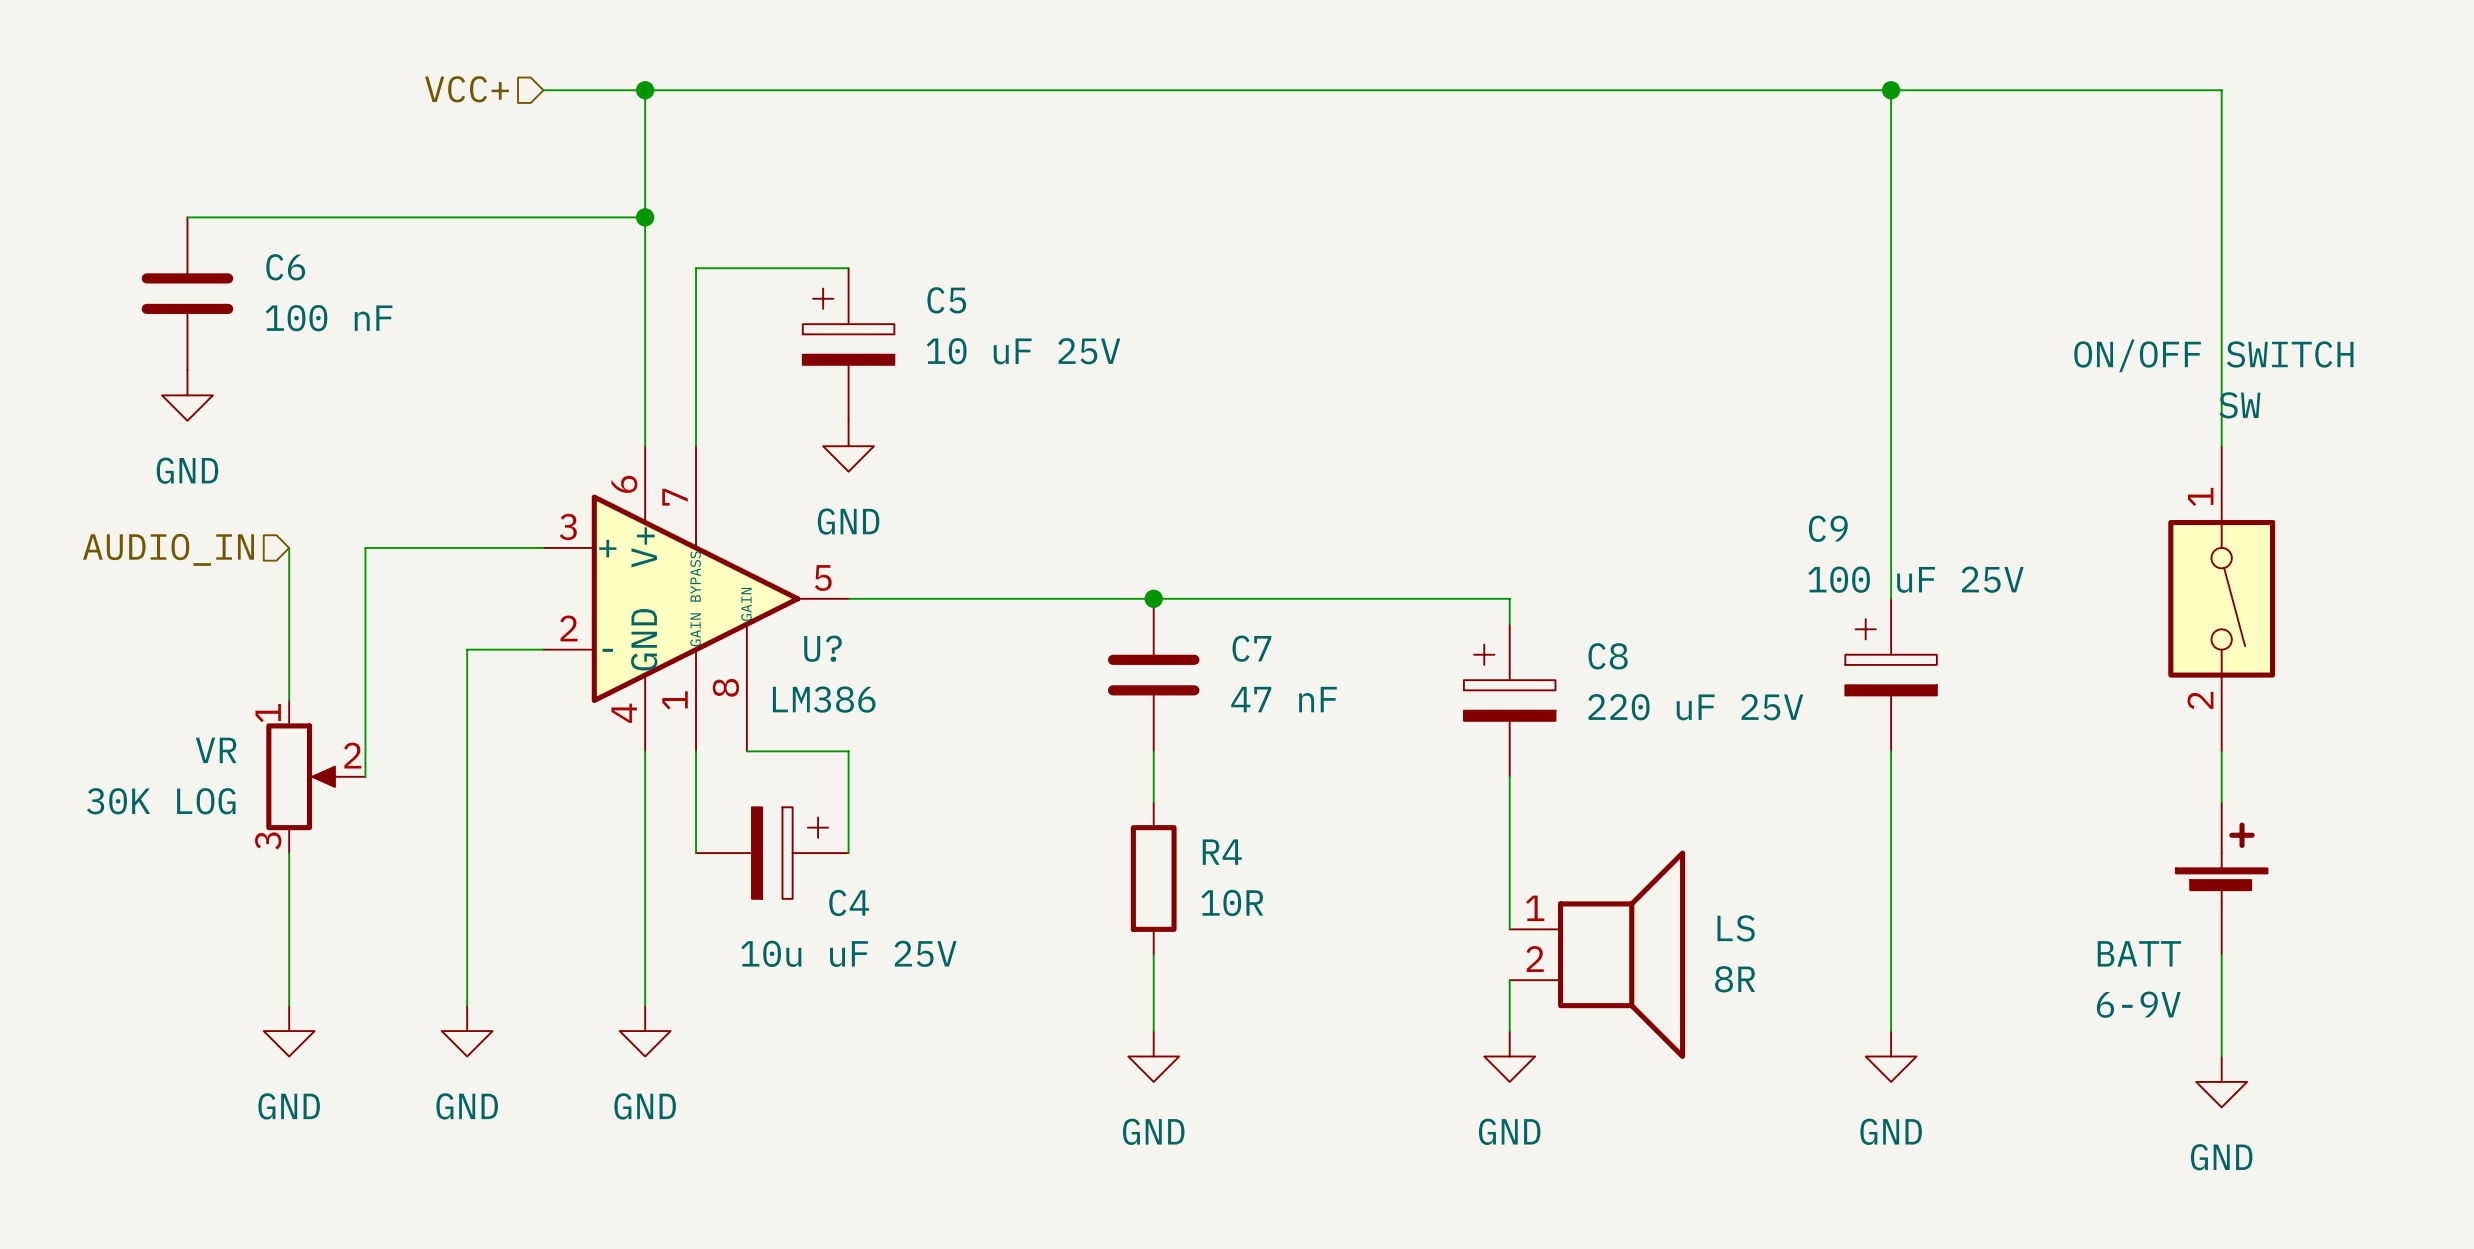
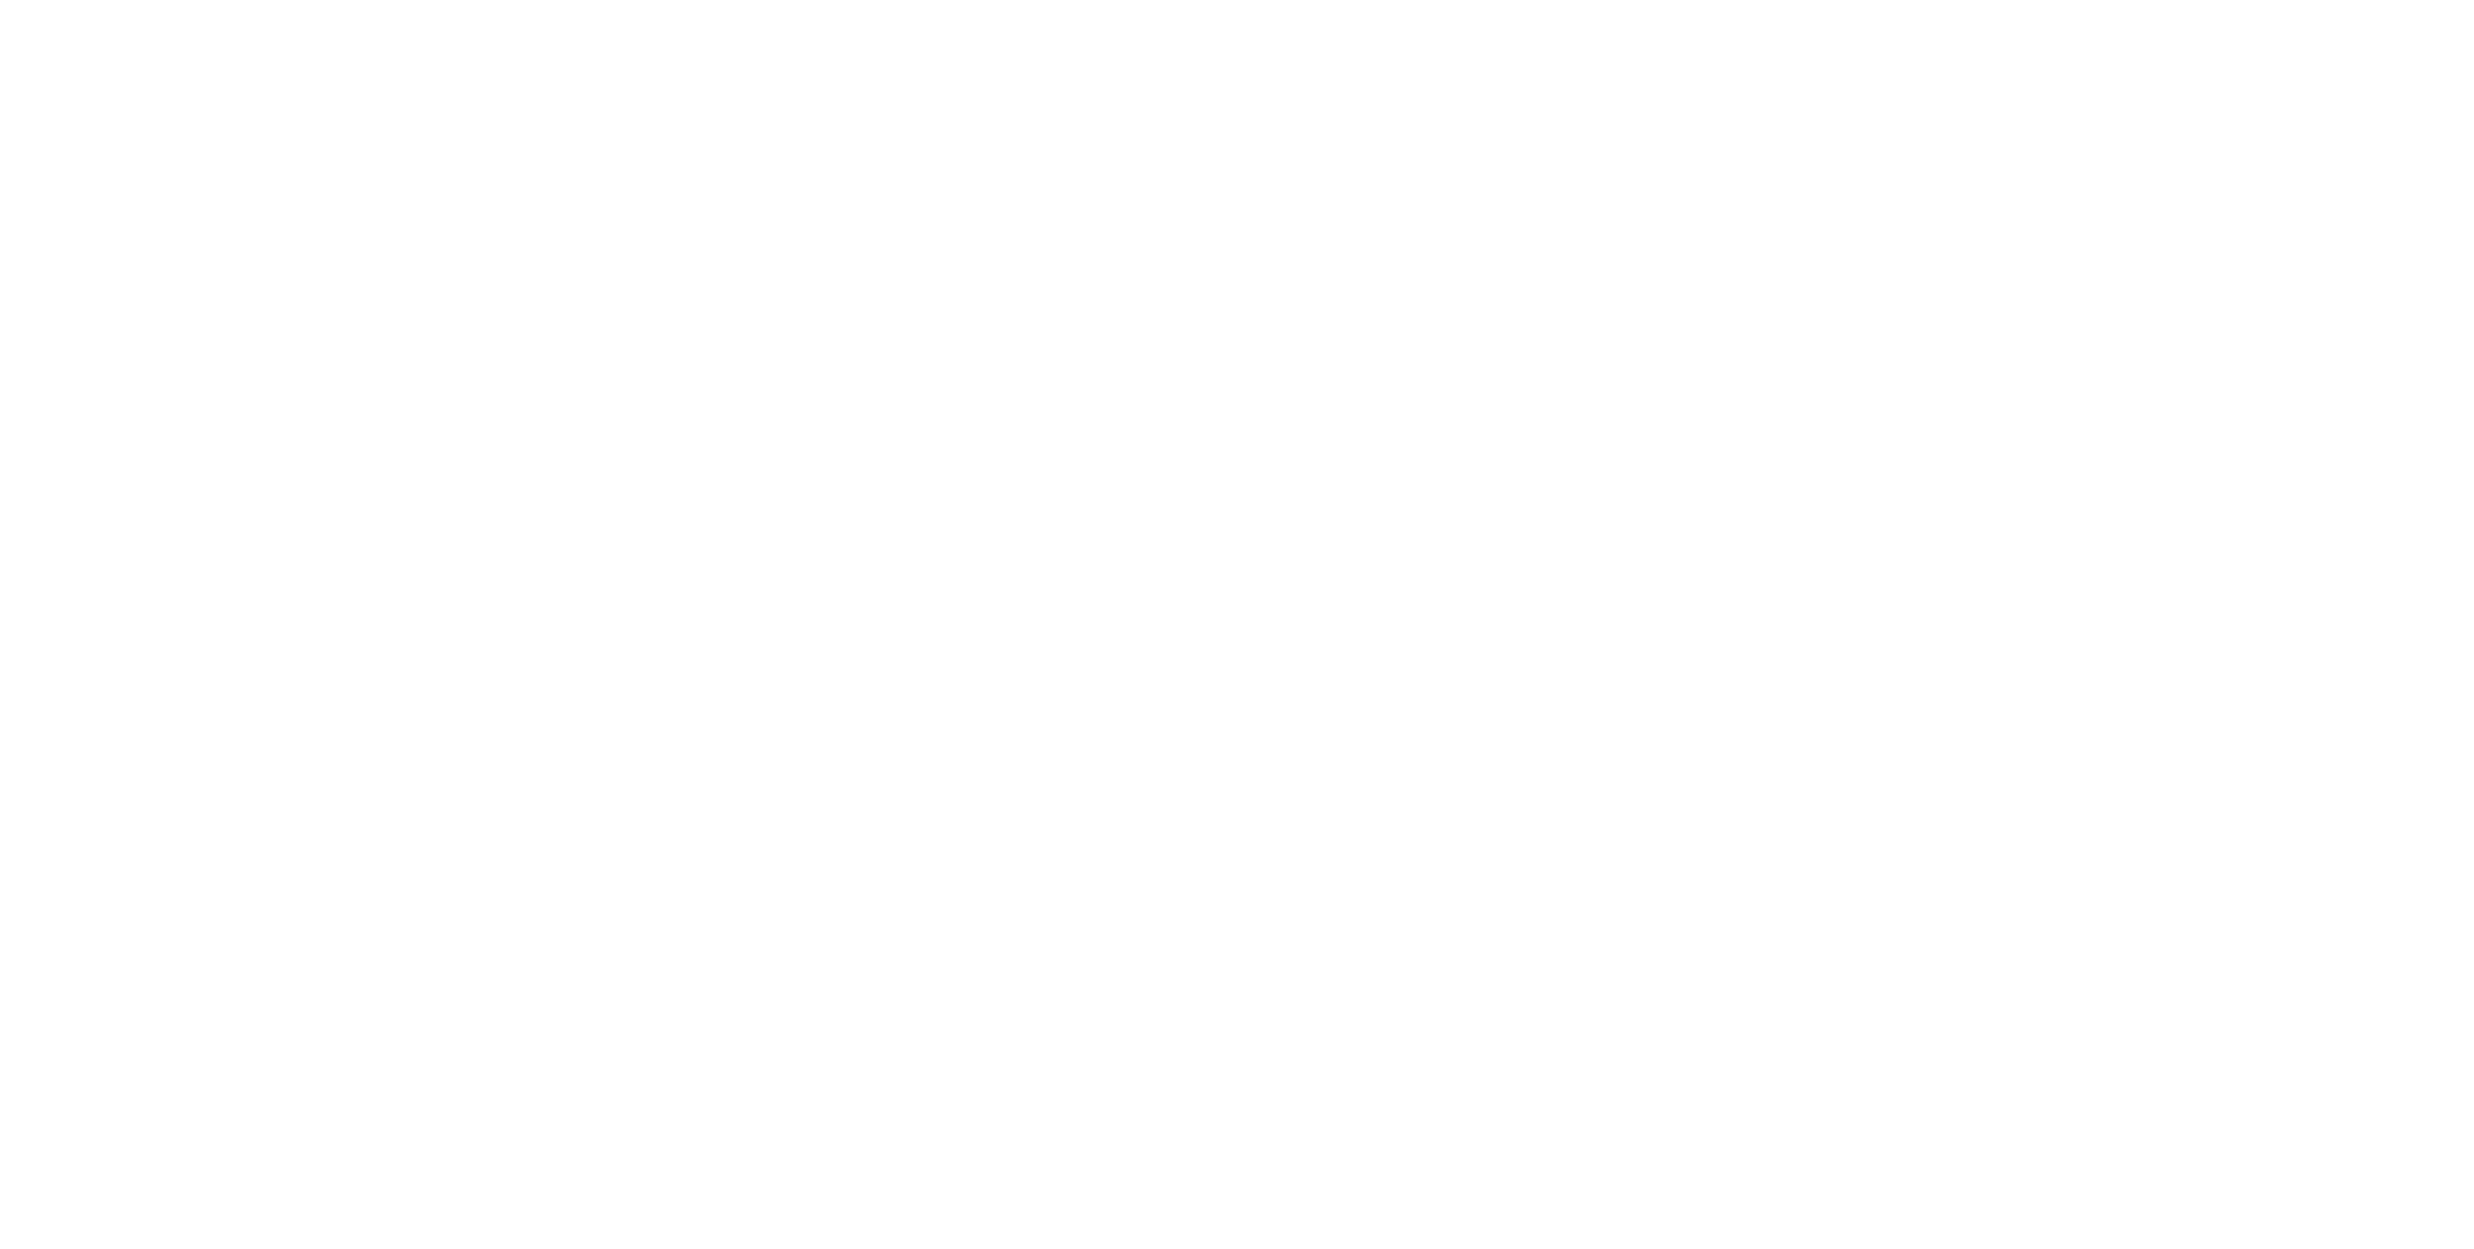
hierarchical label: VCC+ (466, 89) -> none
wire: (543, 90) (2221, 90) (2221, 446) -> none
wire: (645, 90) (645, 446) -> none
junction: (645, 90) -> none
wire: (1891, 90) (1891, 598) -> none
junction: (1891, 90) -> none
wire: (187, 217) (645, 217) -> none
junction: (645, 217) -> none
wire: (848, 268) (696, 268) (696, 446) -> none
C6: 100 nF (187, 293) -> none
C5: 10 uF 25V (848, 344) -> none
power symbol: GND (187, 395) -> none
power symbol: GND (848, 446) -> none
wire: (289, 547) (289, 700) -> none
wire: (543, 547) (365, 547) (365, 776) -> none
hierarchical label: AUDIO_IN (168, 549) -> none
U?: LM386 (696, 598) -> none
wire: (848, 598) (1509, 598) (1509, 624) -> none
junction: (1153, 598) -> none
SW: ON/OFF SWITCH (2221, 598) -> none
wire: (543, 649) (467, 649) (467, 1005) -> none
C7: 47 nF (1153, 675) -> none
C9: 100 uF 25V (1891, 675) -> none
C8: 220 uF 25V (1509, 700) -> none
wire: (645, 751) (645, 1005) -> none
wire: (696, 751) (696, 853) -> none
wire: (746, 751) (848, 751) (848, 853) -> none
wire: (1153, 751) (1153, 802) -> none
wire: (1891, 751) (1891, 1031) -> none
wire: (2221, 751) (2221, 802) -> none
VR: 30K LOG (315, 776) -> none
wire: (1509, 776) (1509, 929) -> none
wire: (289, 853) (289, 1005) -> none
C4: 10u uF 25V (772, 853) -> none
R4: 10R (1153, 878) -> none
BATT: 6-9V (2221, 878) -> none
wire: (1153, 954) (1153, 1031) -> none
LS: 8R (1597, 954) -> none
wire: (2221, 954) (2221, 1056) -> none
wire: (1509, 980) (1509, 1031) -> none
power symbol: GND (289, 1031) -> none
power symbol: GND (467, 1031) -> none
power symbol: GND (645, 1031) -> none
power symbol: GND (1153, 1056) -> none
power symbol: GND (1509, 1056) -> none
power symbol: GND (1891, 1056) -> none
power symbol: GND (2221, 1081) -> none

